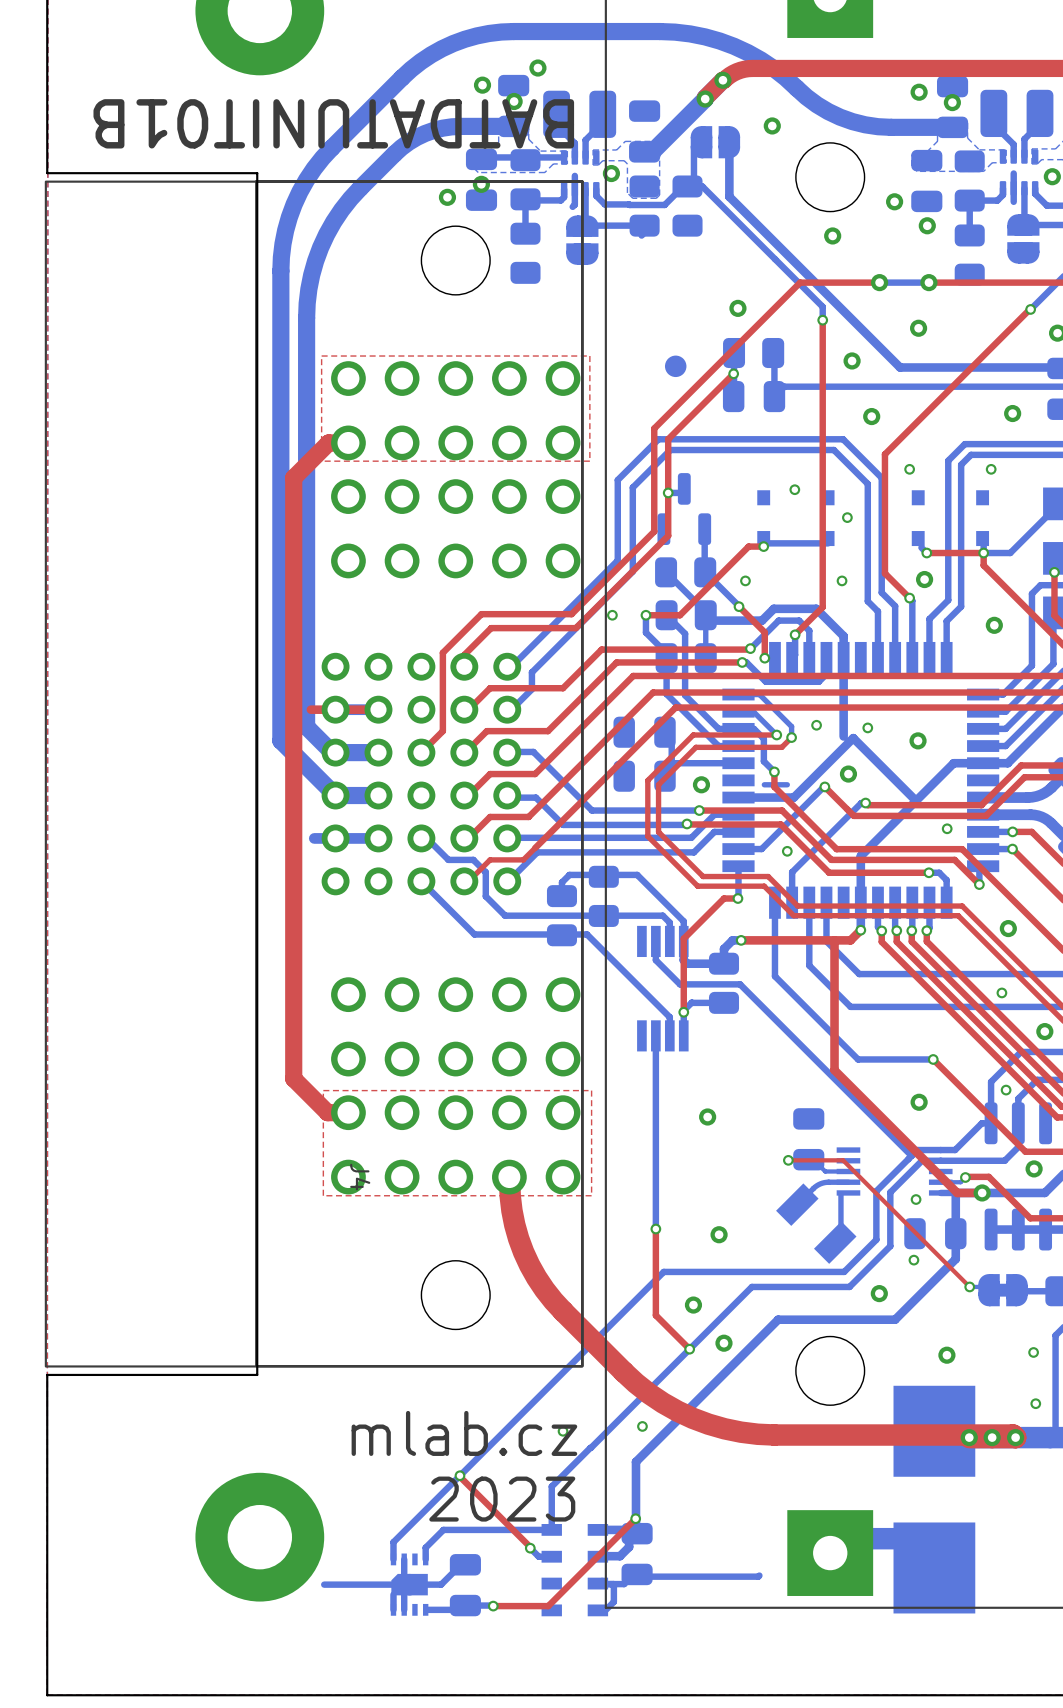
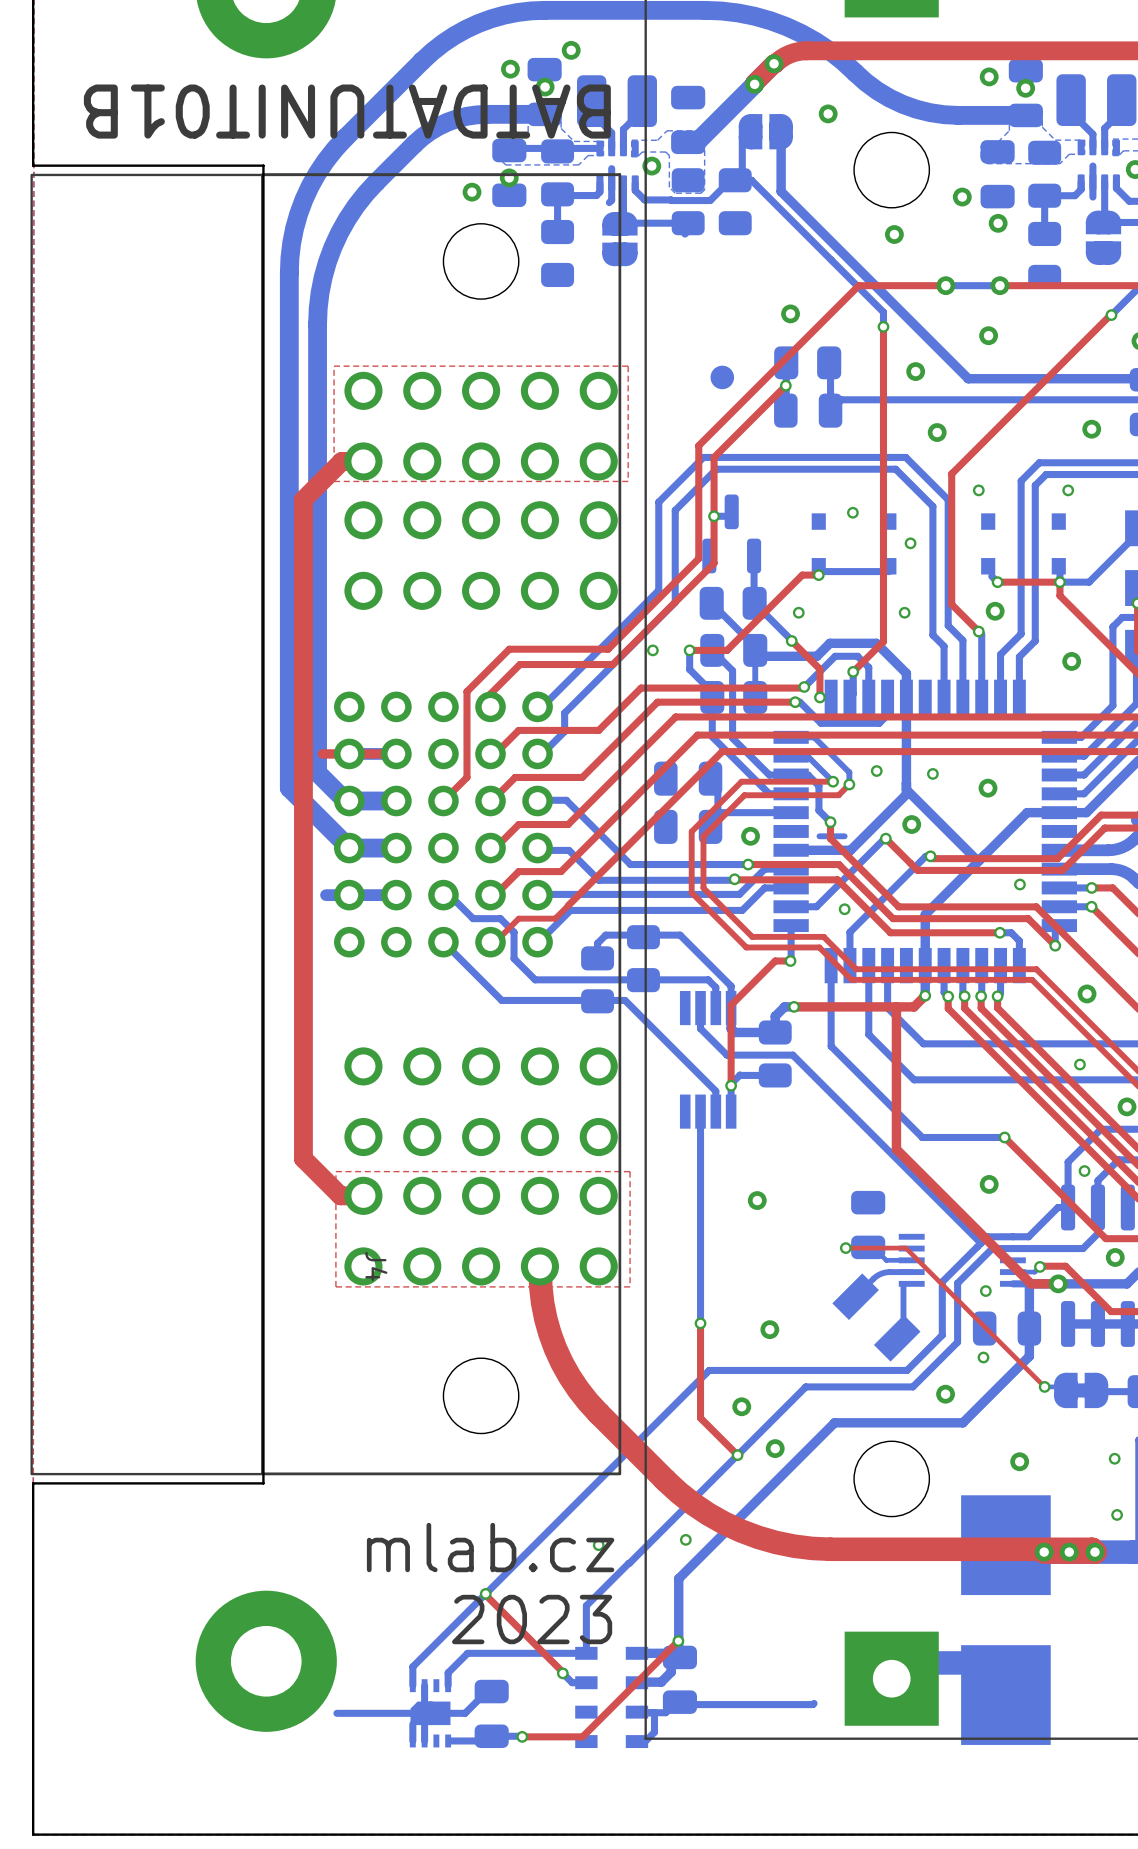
bottom track: none -> (906, 789) (978, 861)
bottom track: (792, 797) (853, 738) (916, 800) -> (850, 850) (906, 794) (906, 783)

